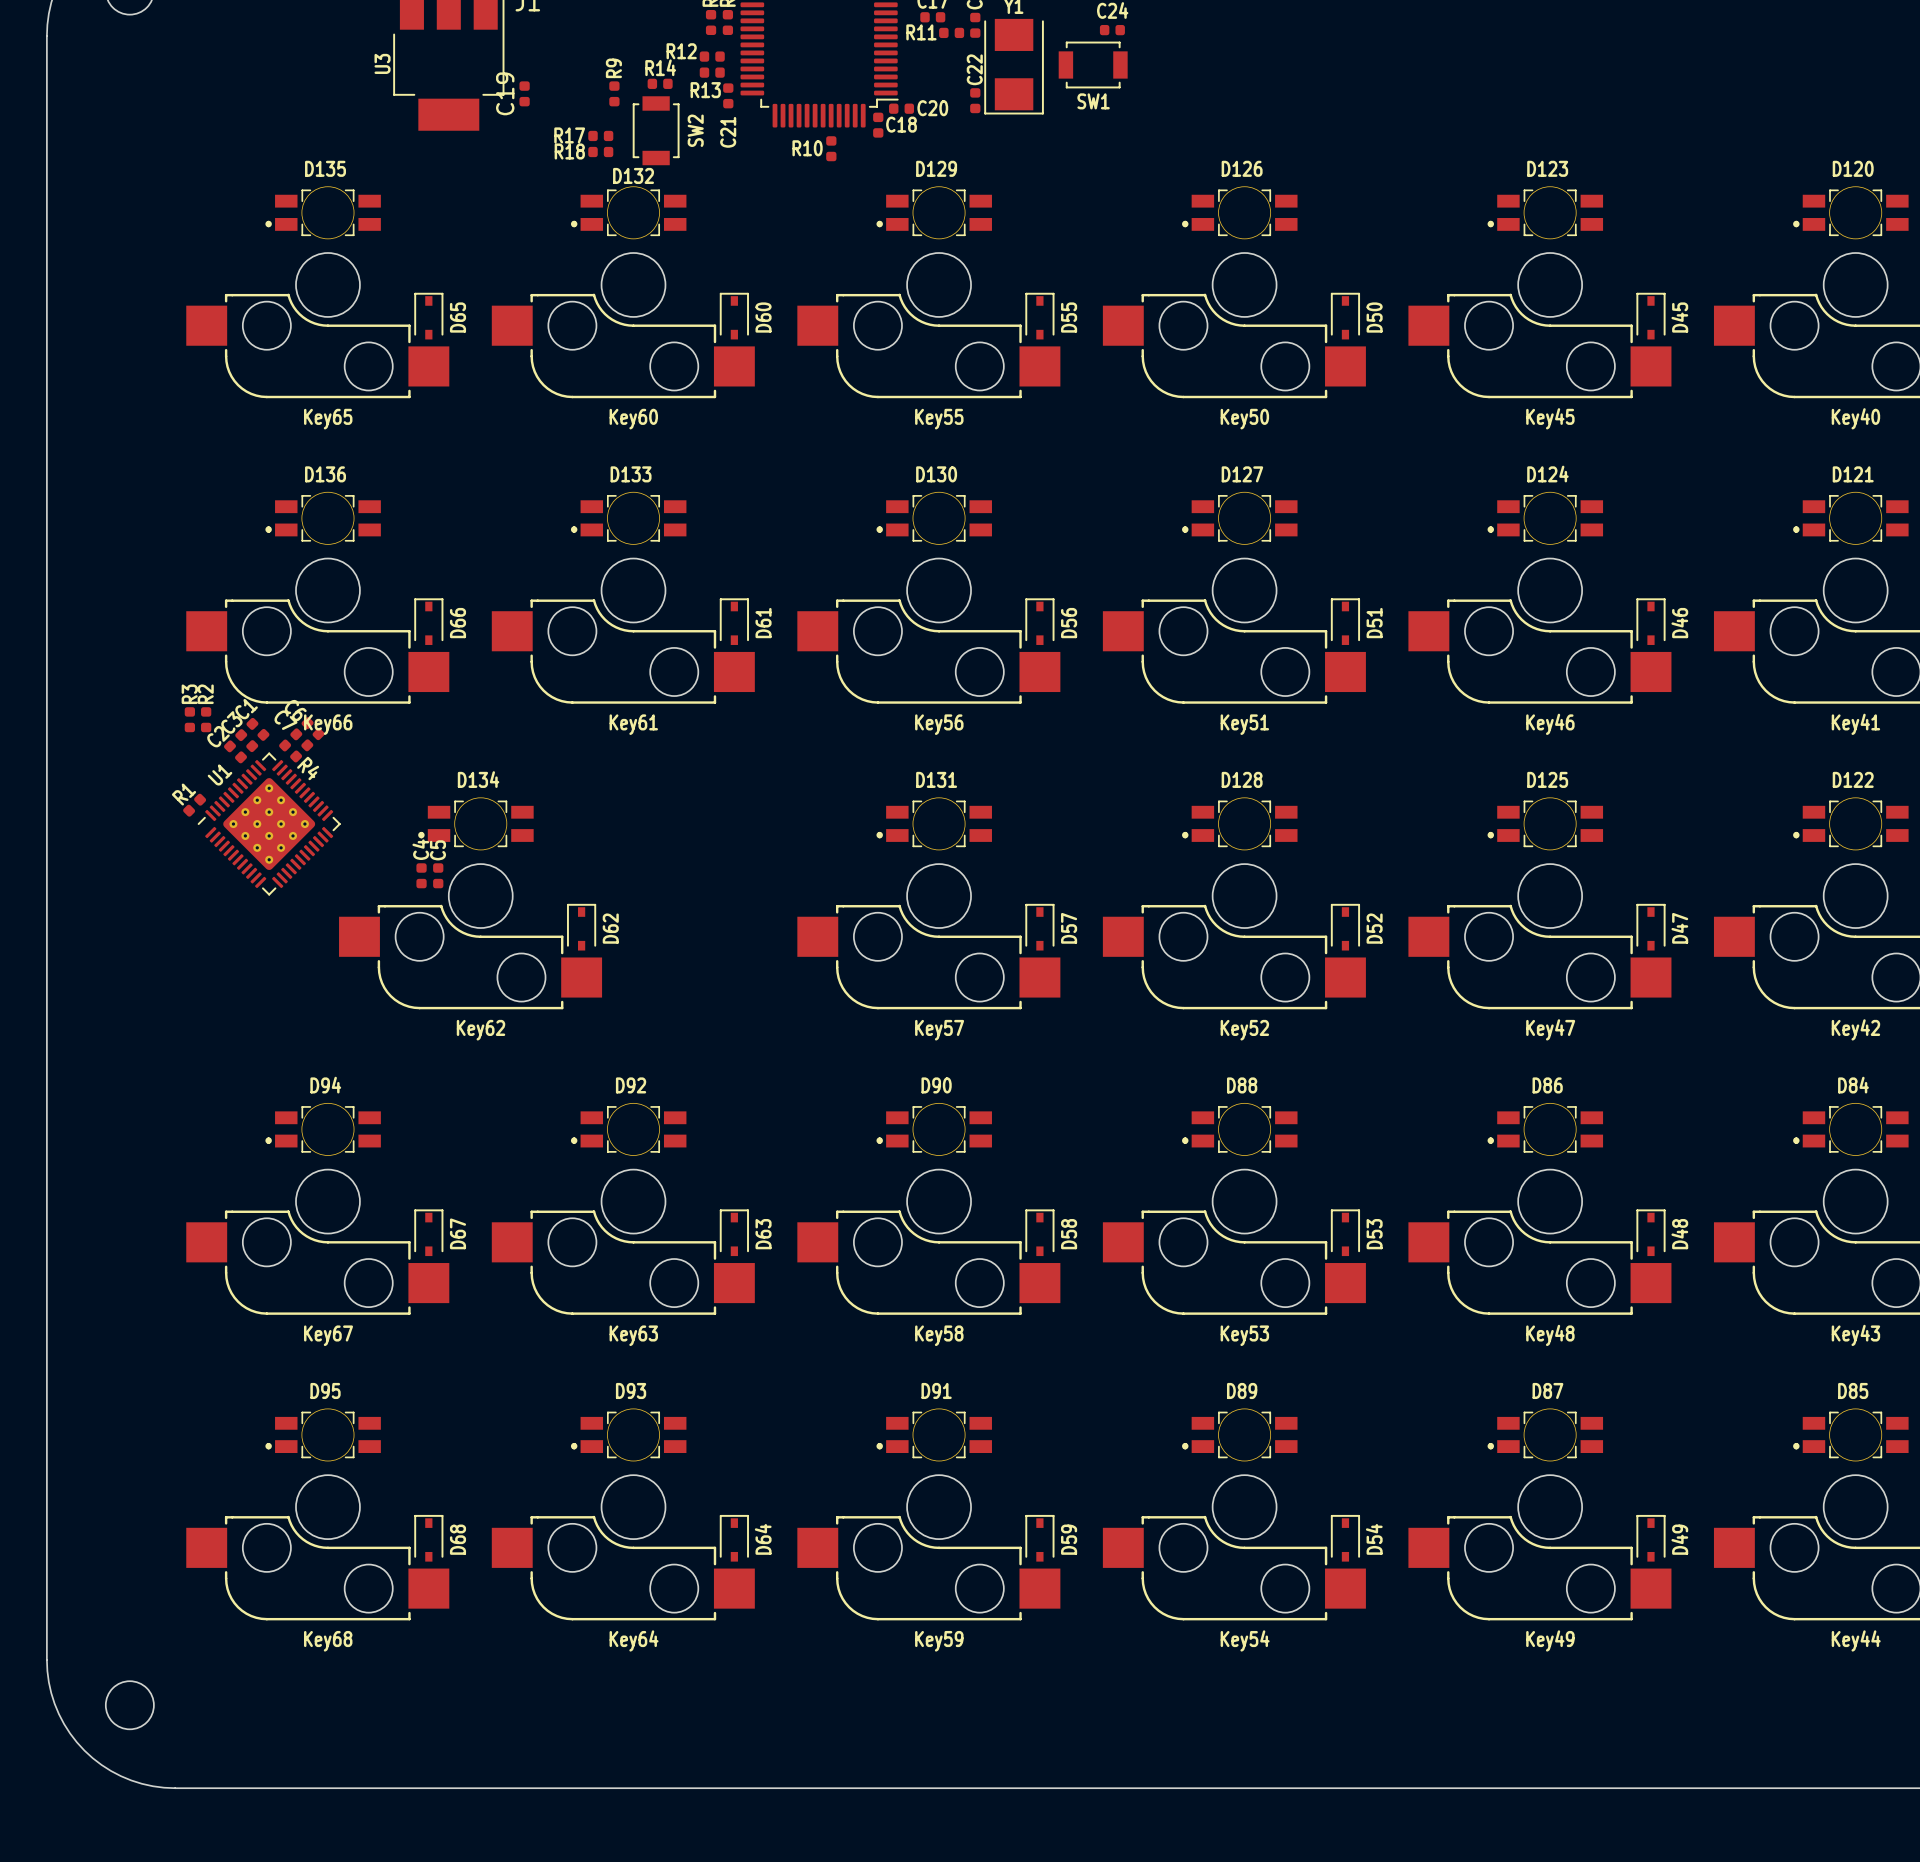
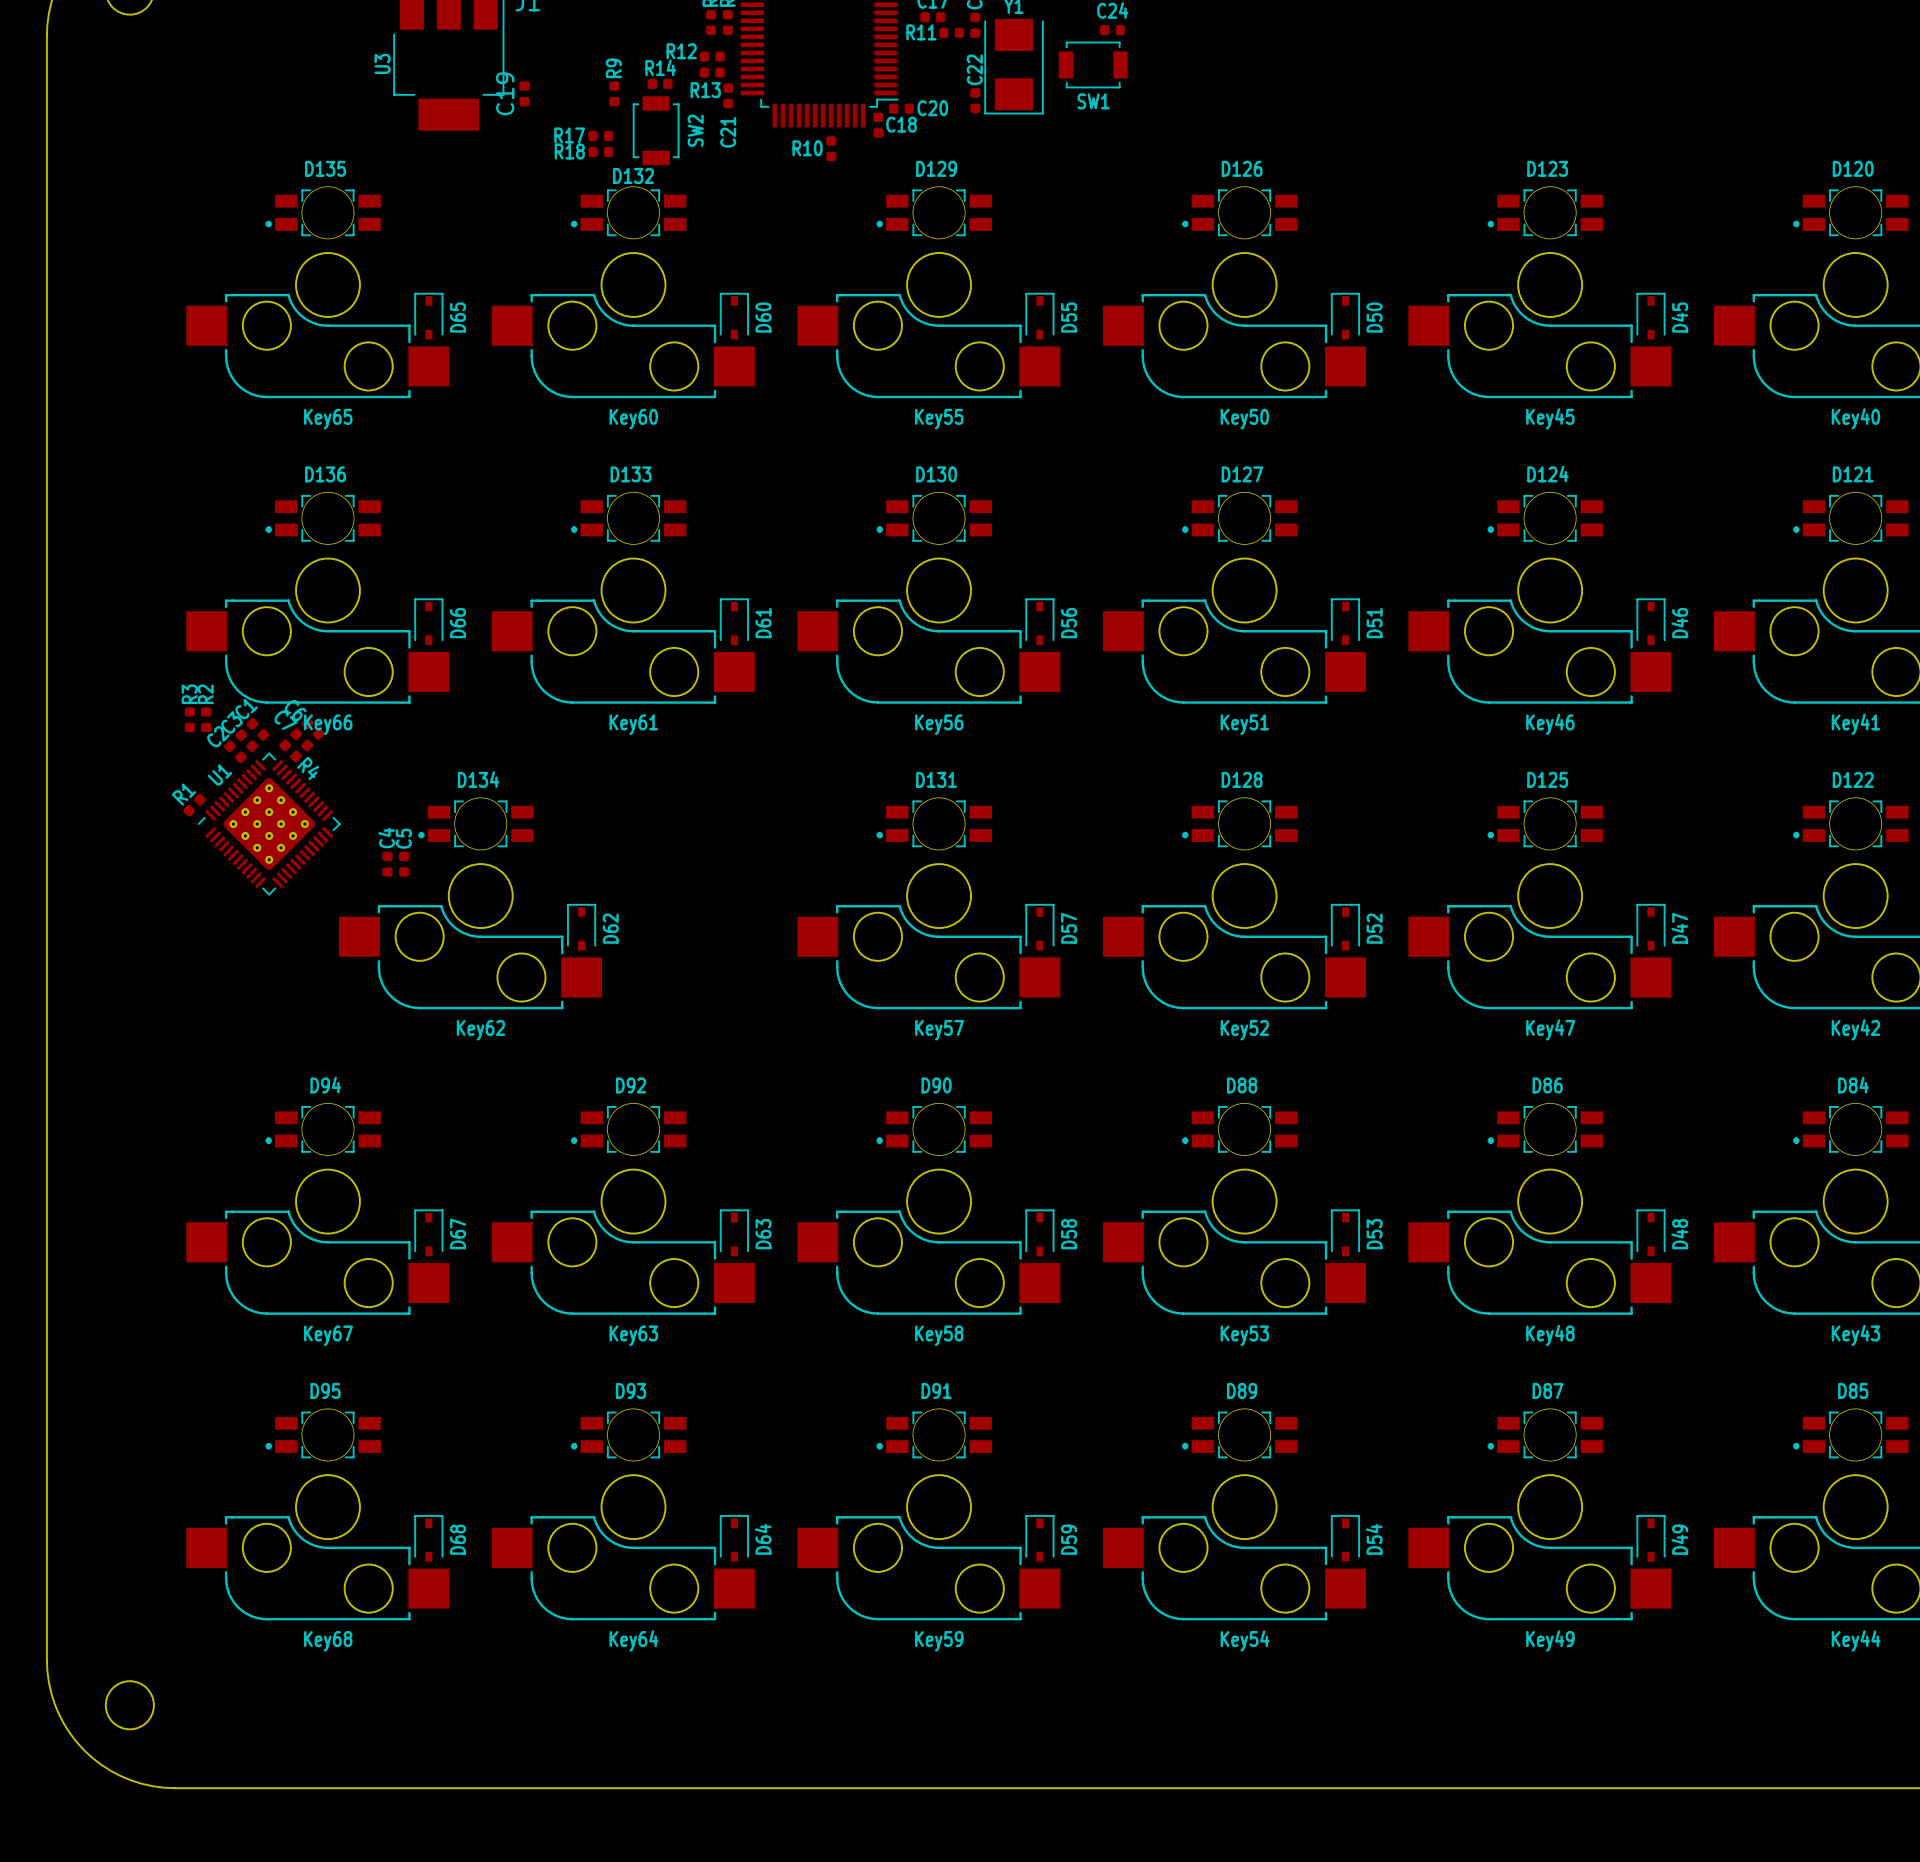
C4 position: (421, 875) -> (387, 864)
C5 position: (438, 875) -> (404, 864)

